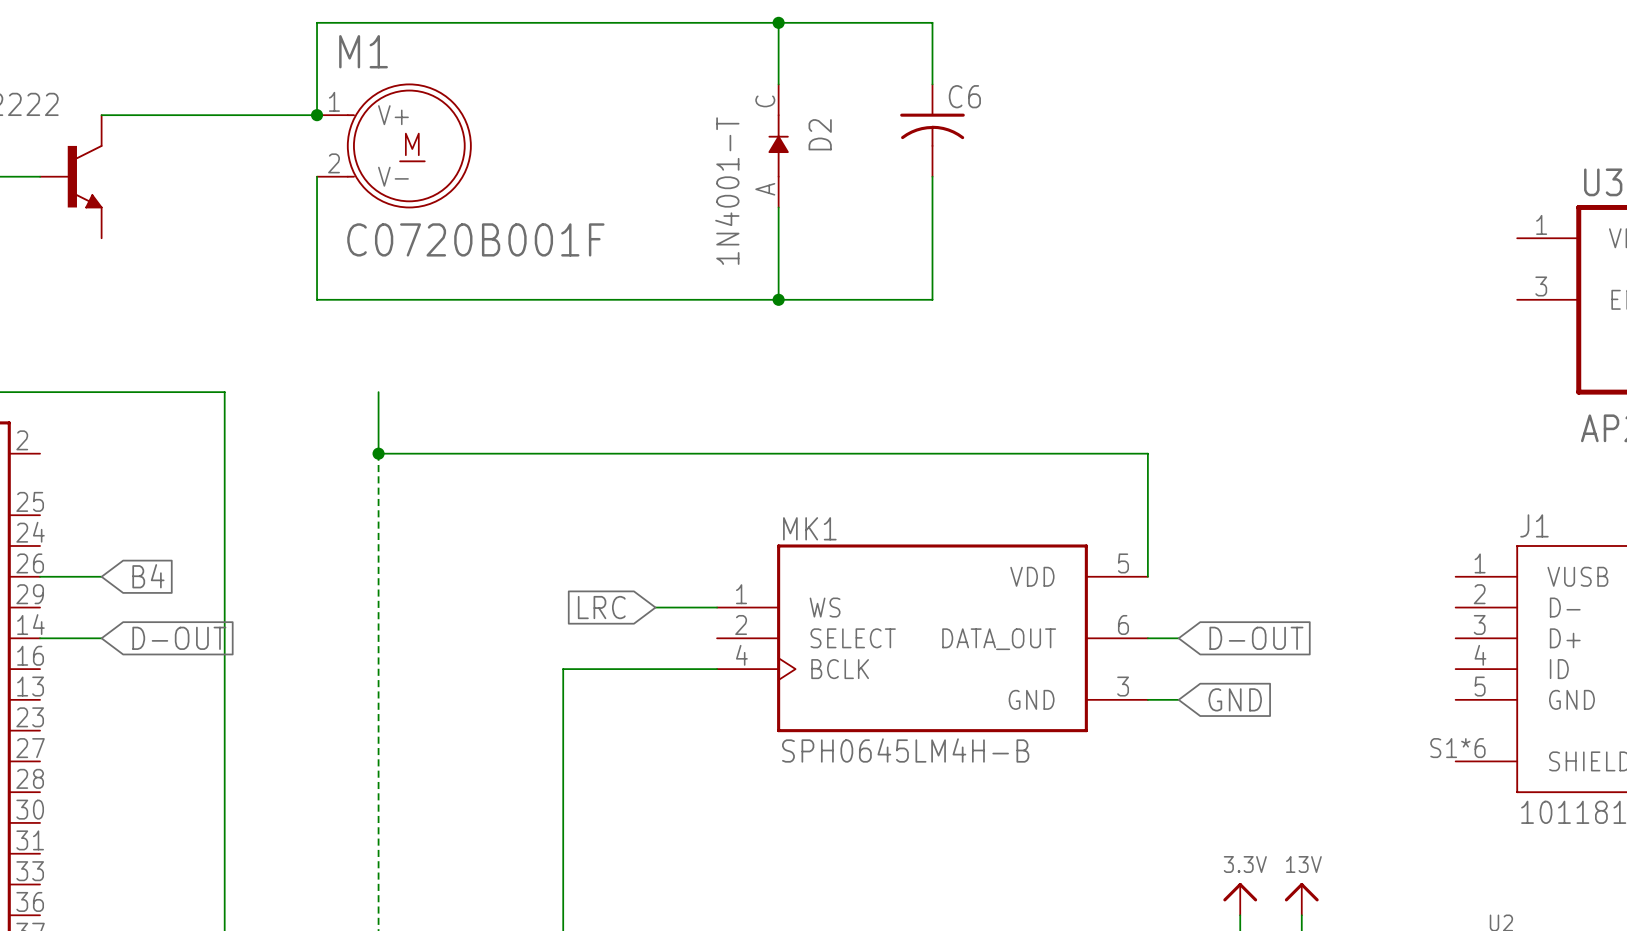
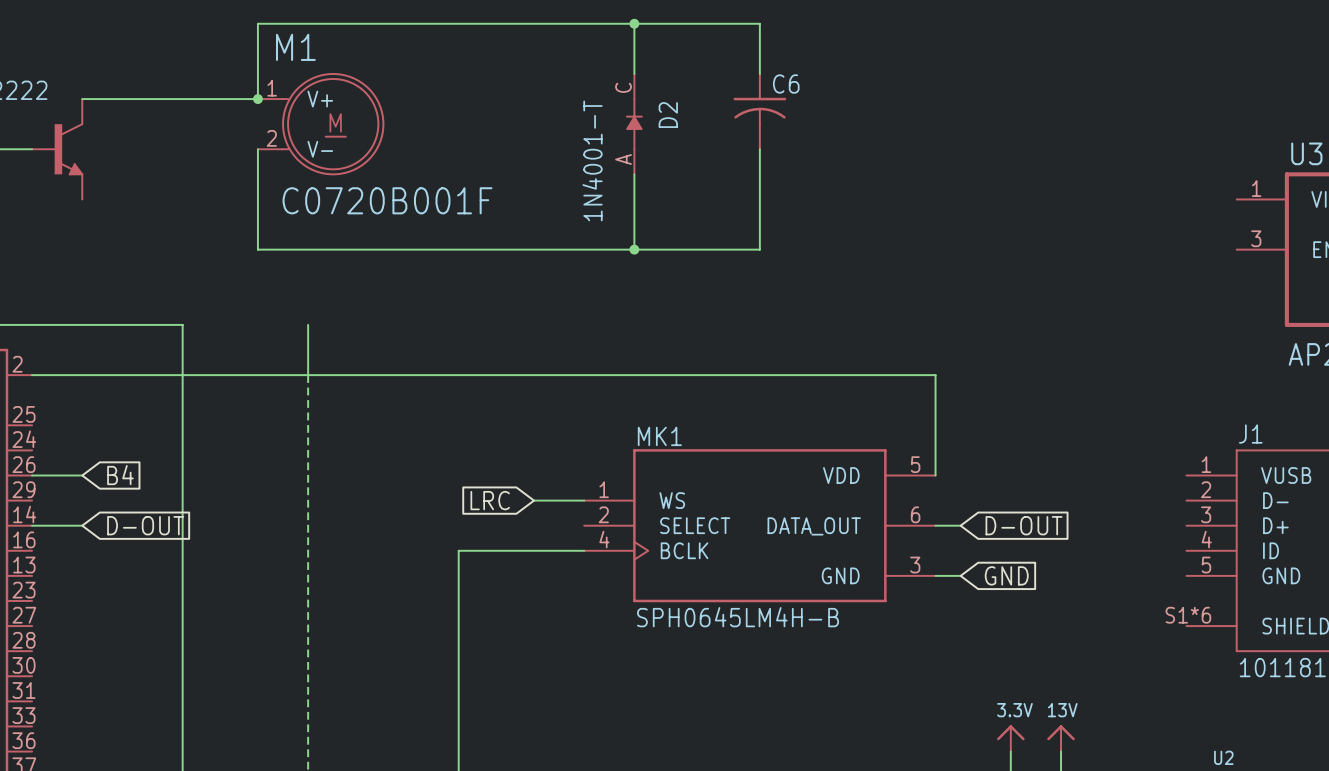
wire: none -> (32, 375) (308, 375)
junction: (378, 453) -> none

